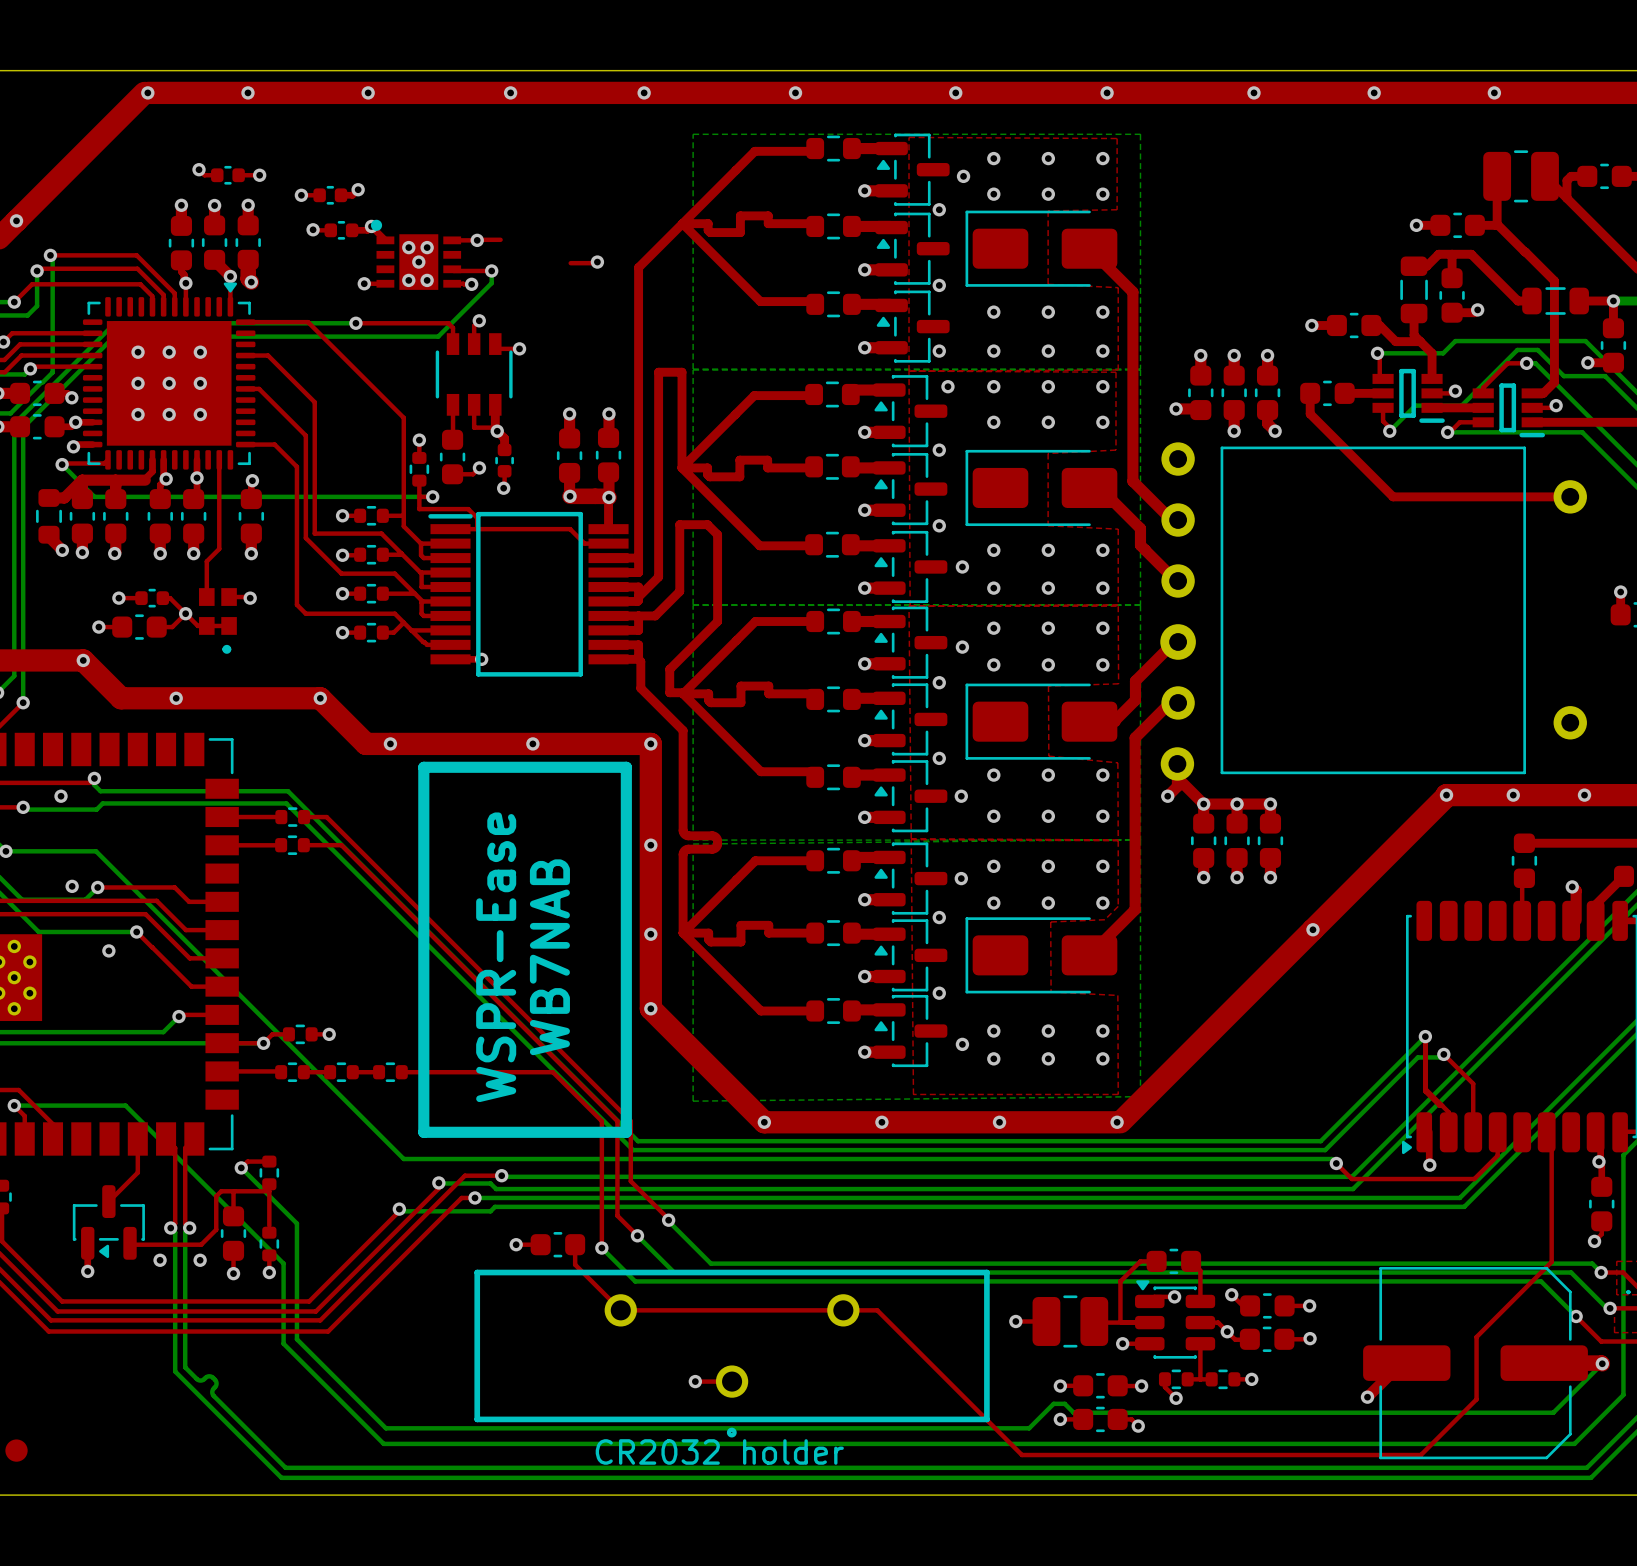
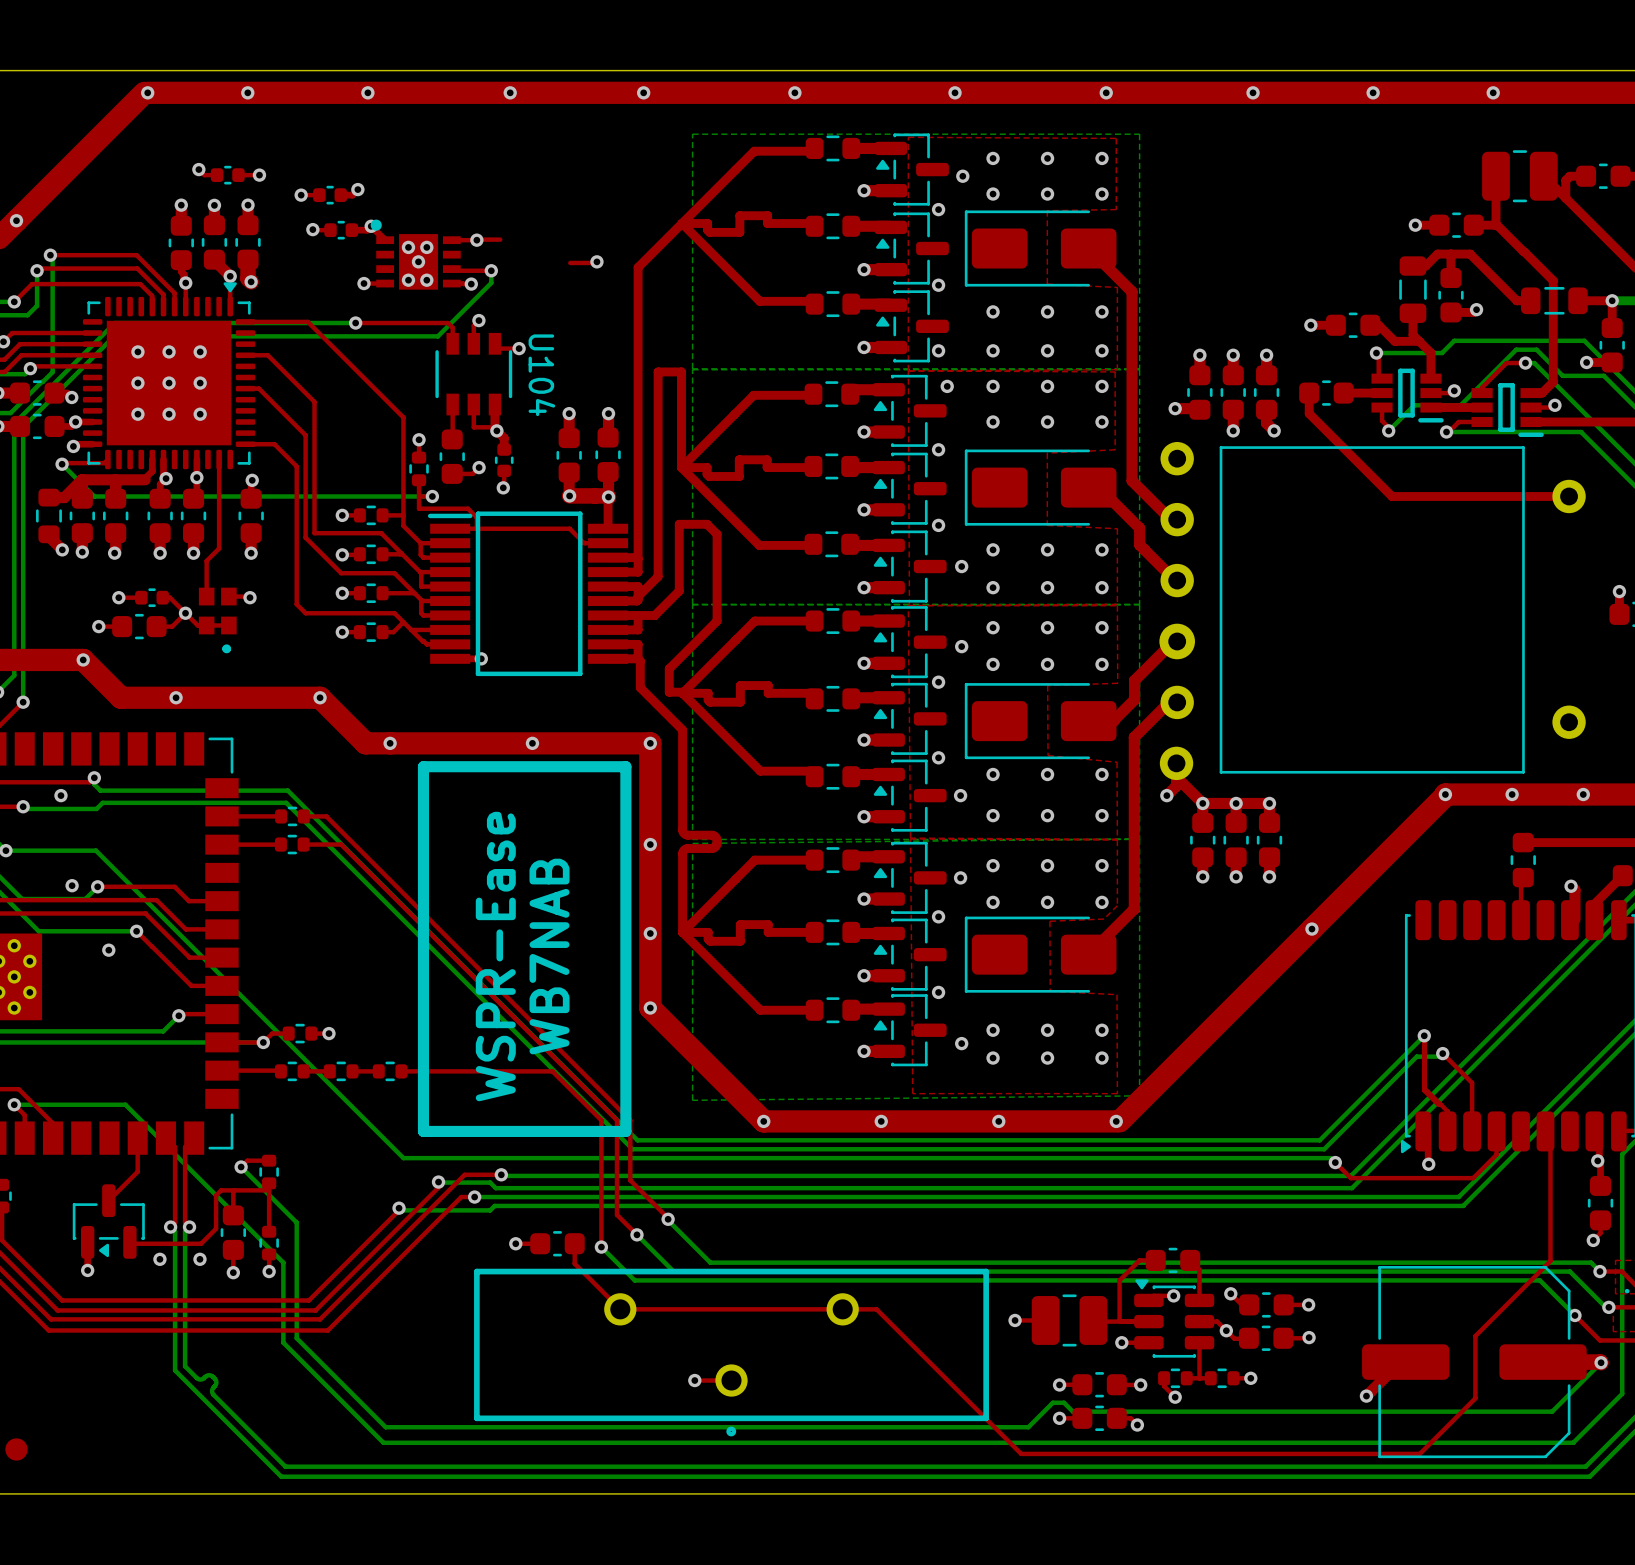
U104 name: none -> U104 (541, 375)
part text: CR2032 holder (719, 1451) -> none

